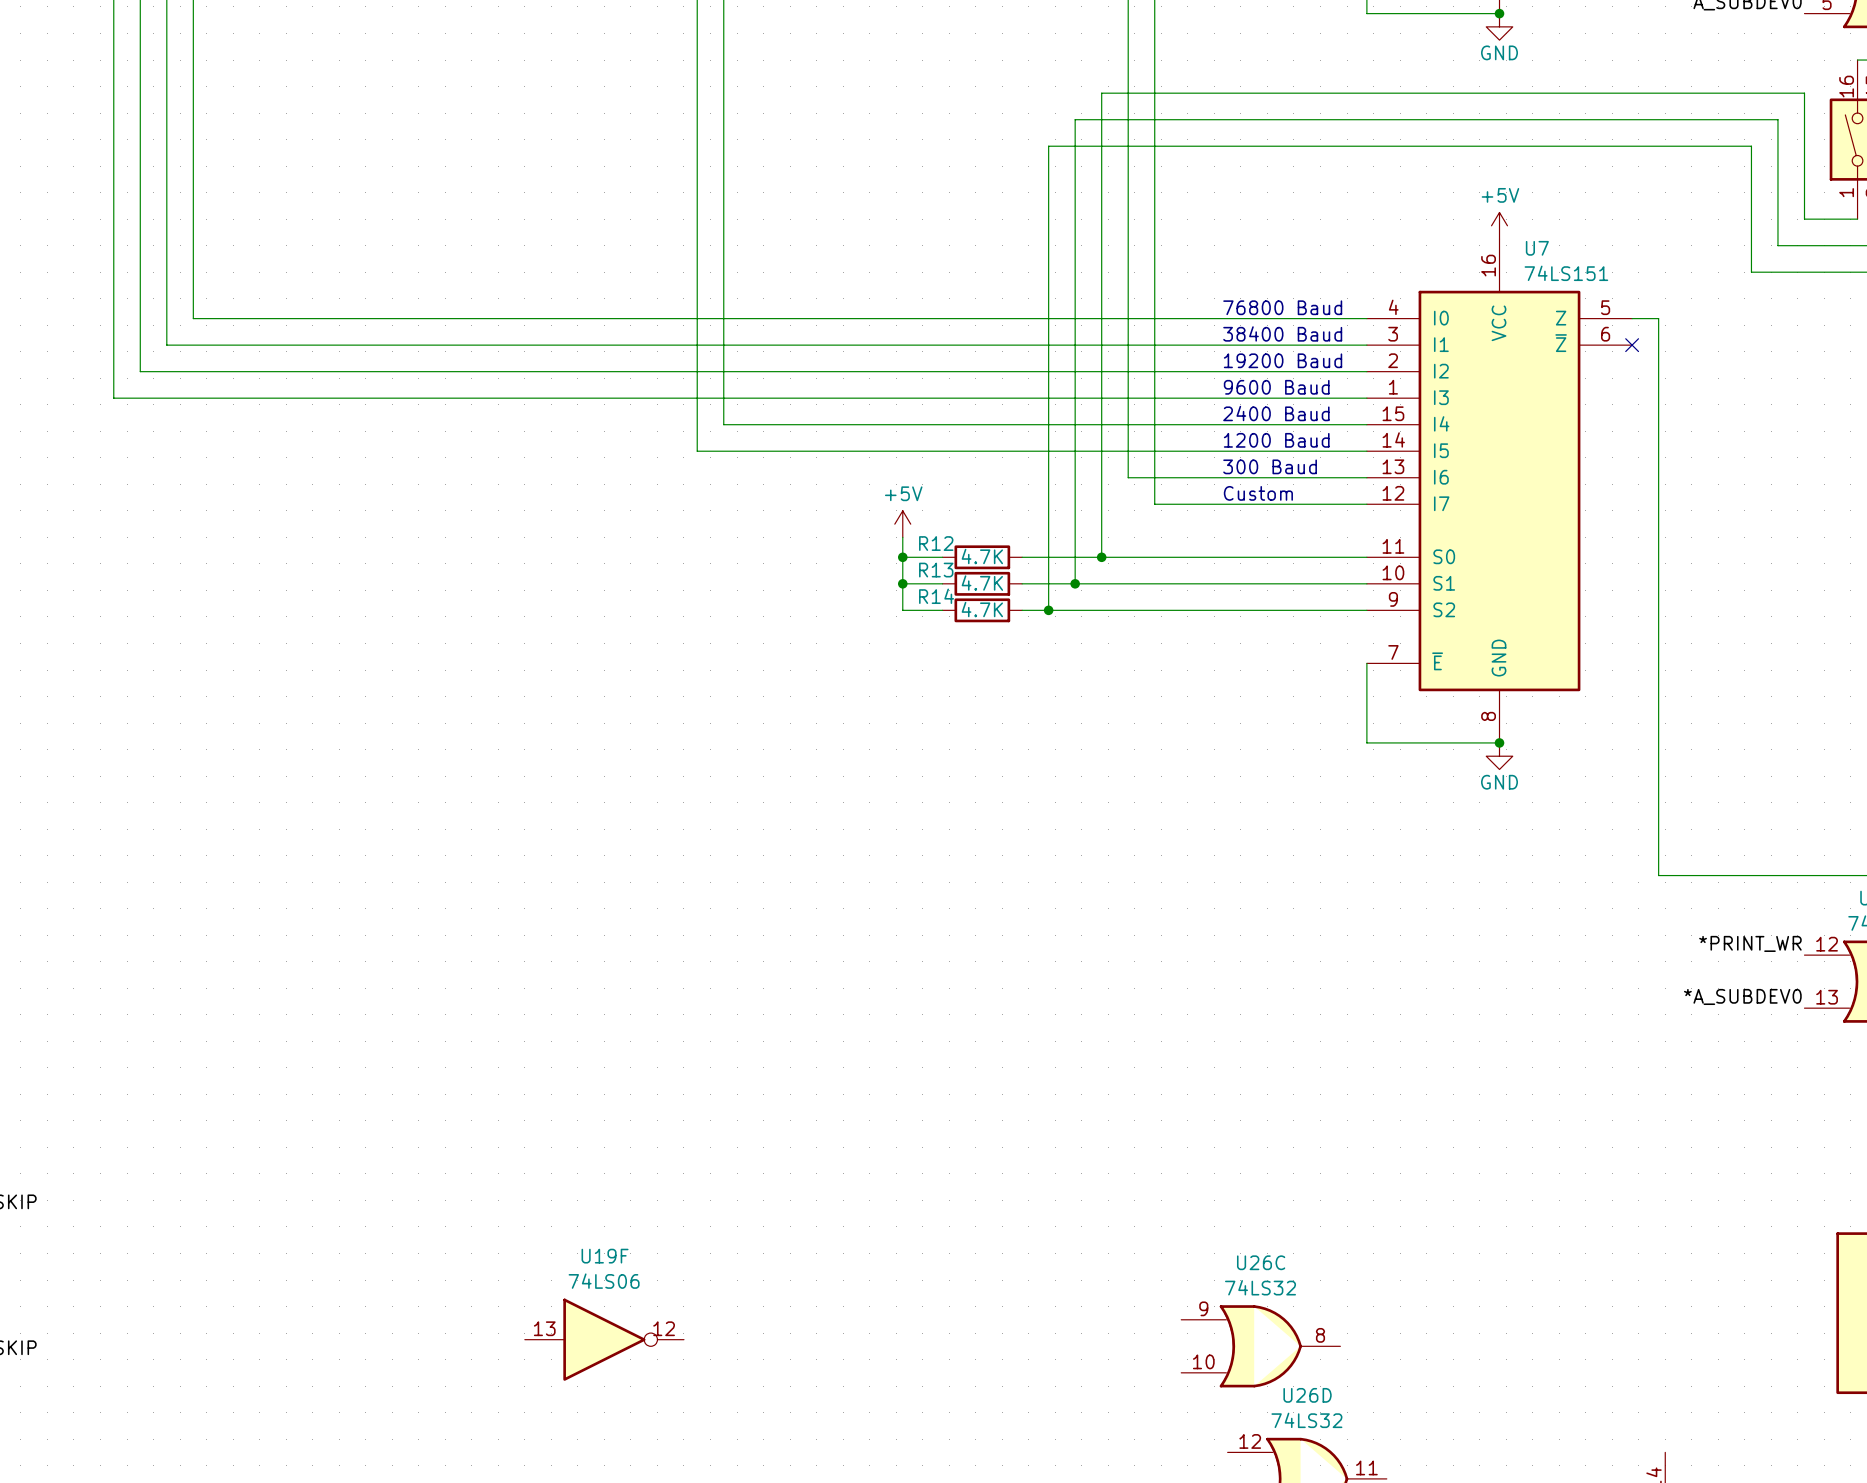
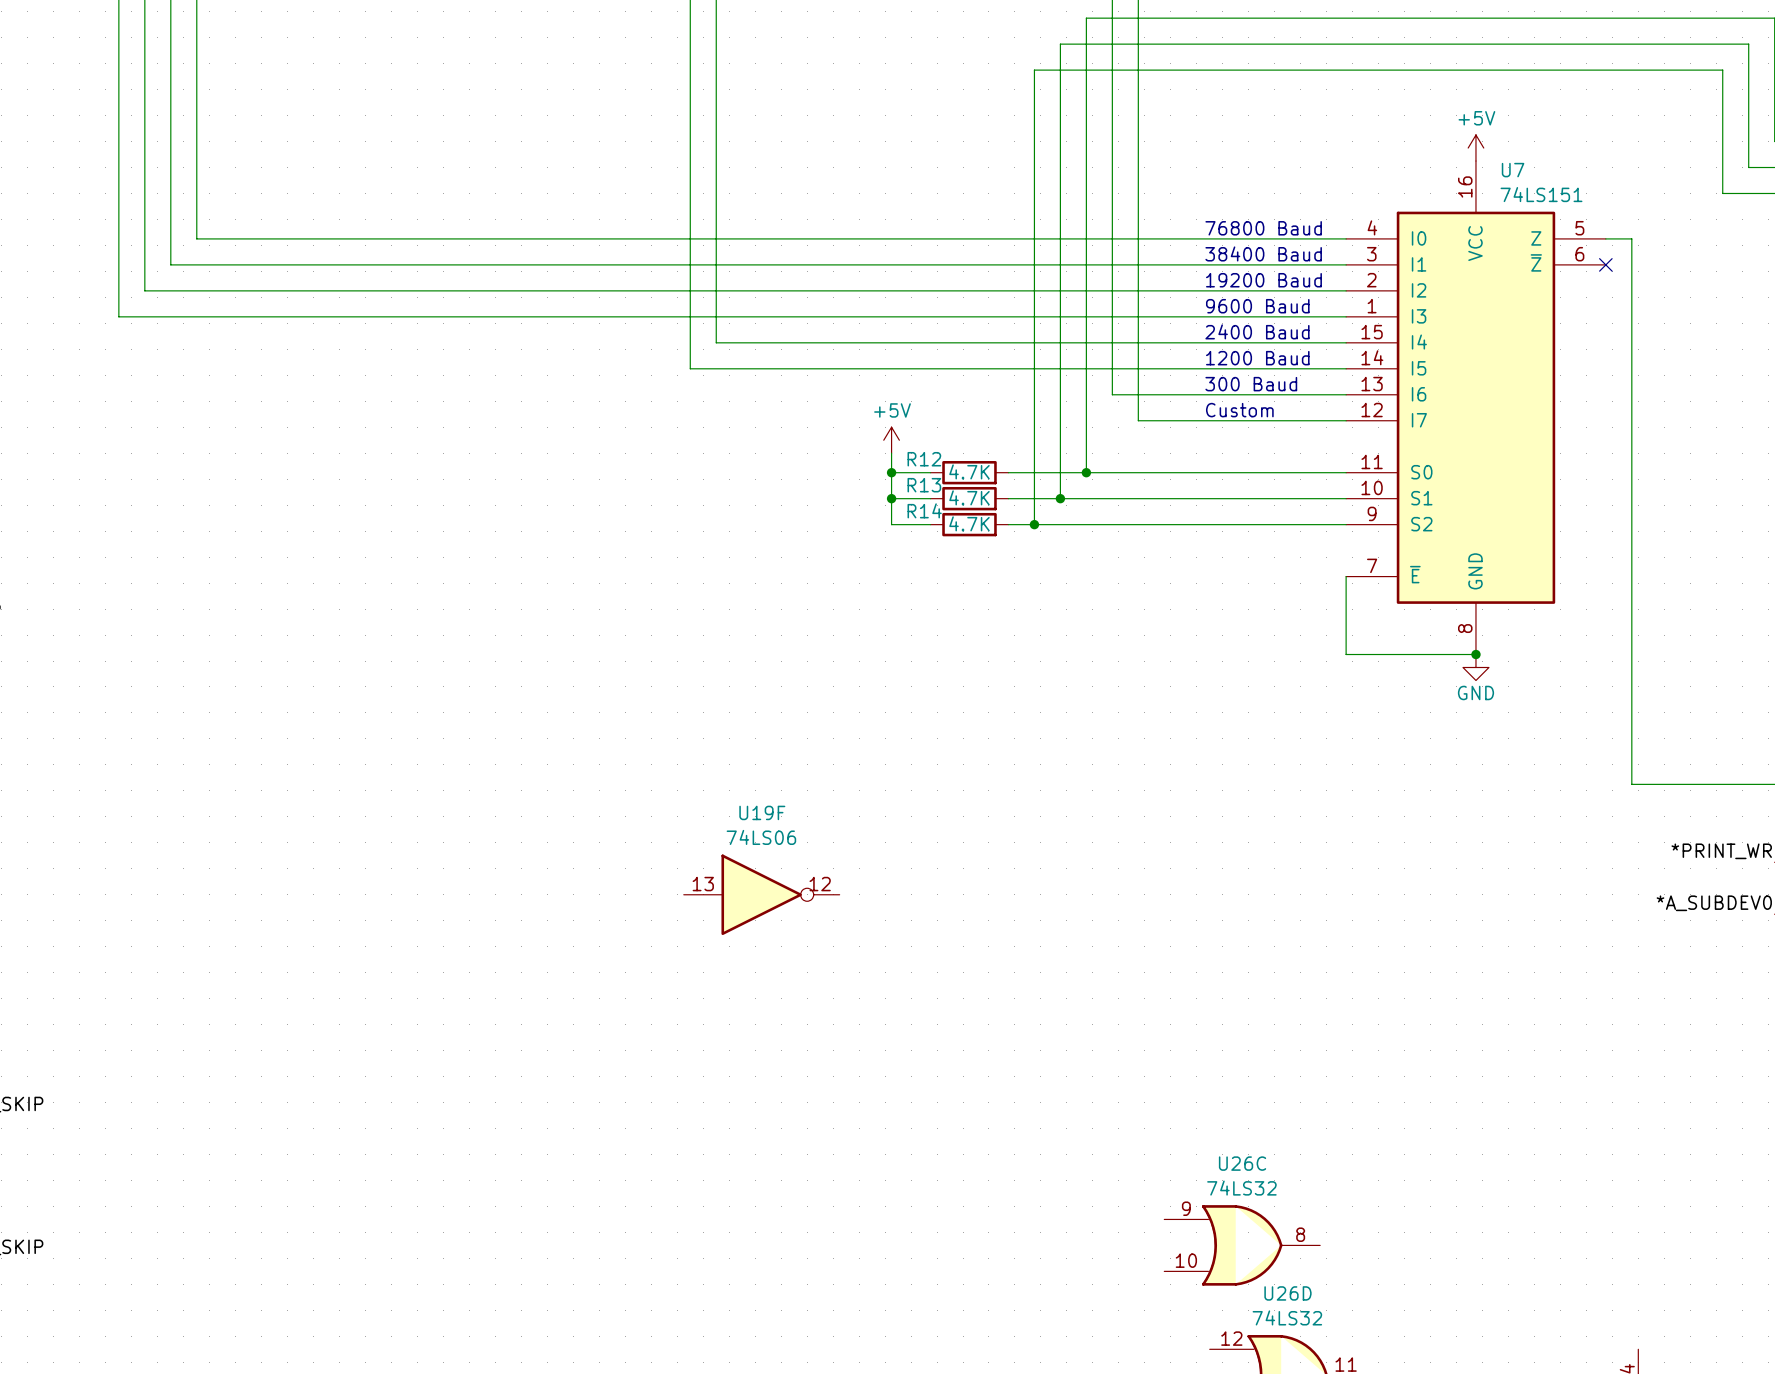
U19F position: (604, 1339) -> (761, 894)

